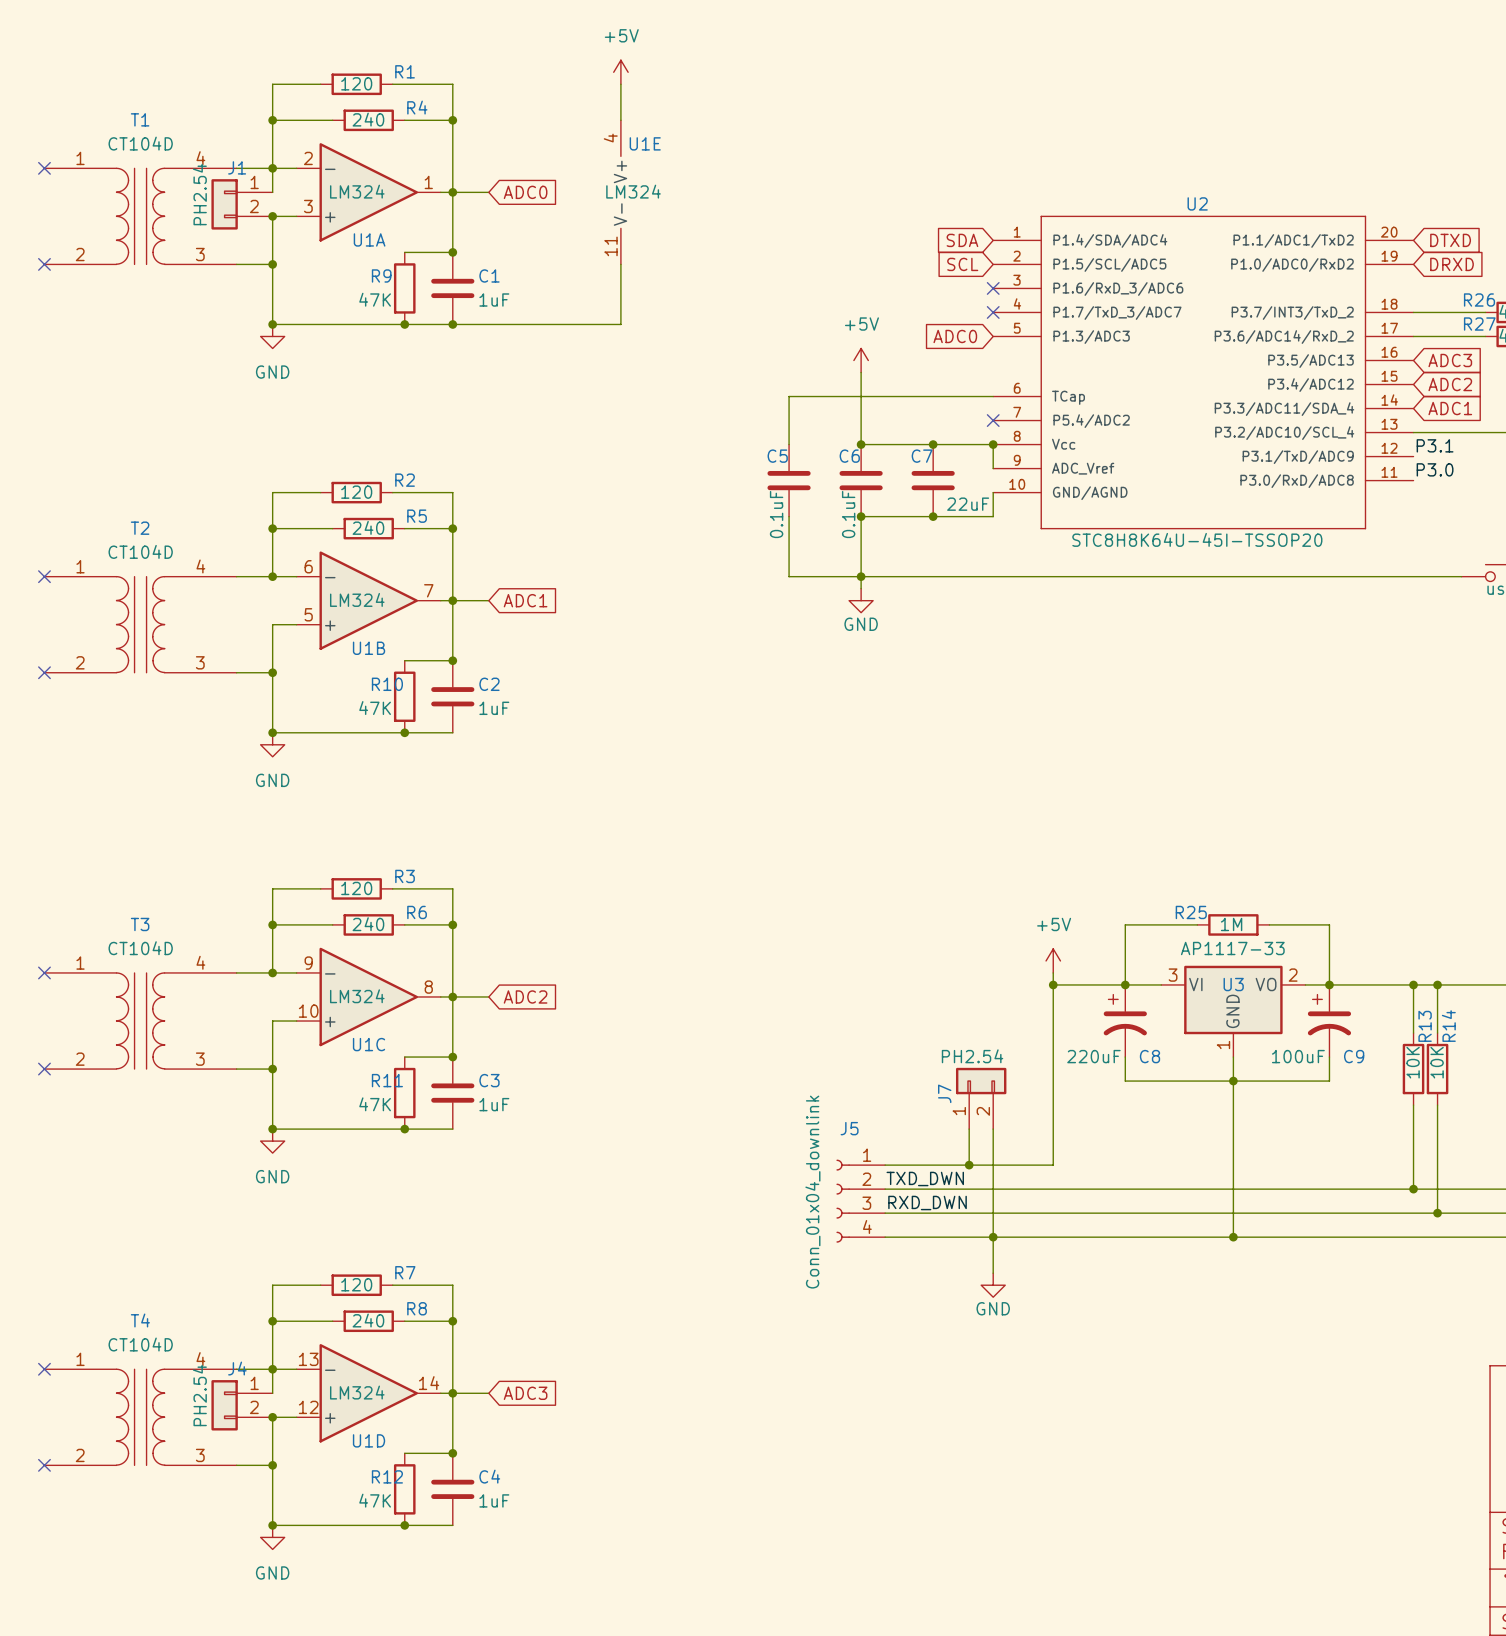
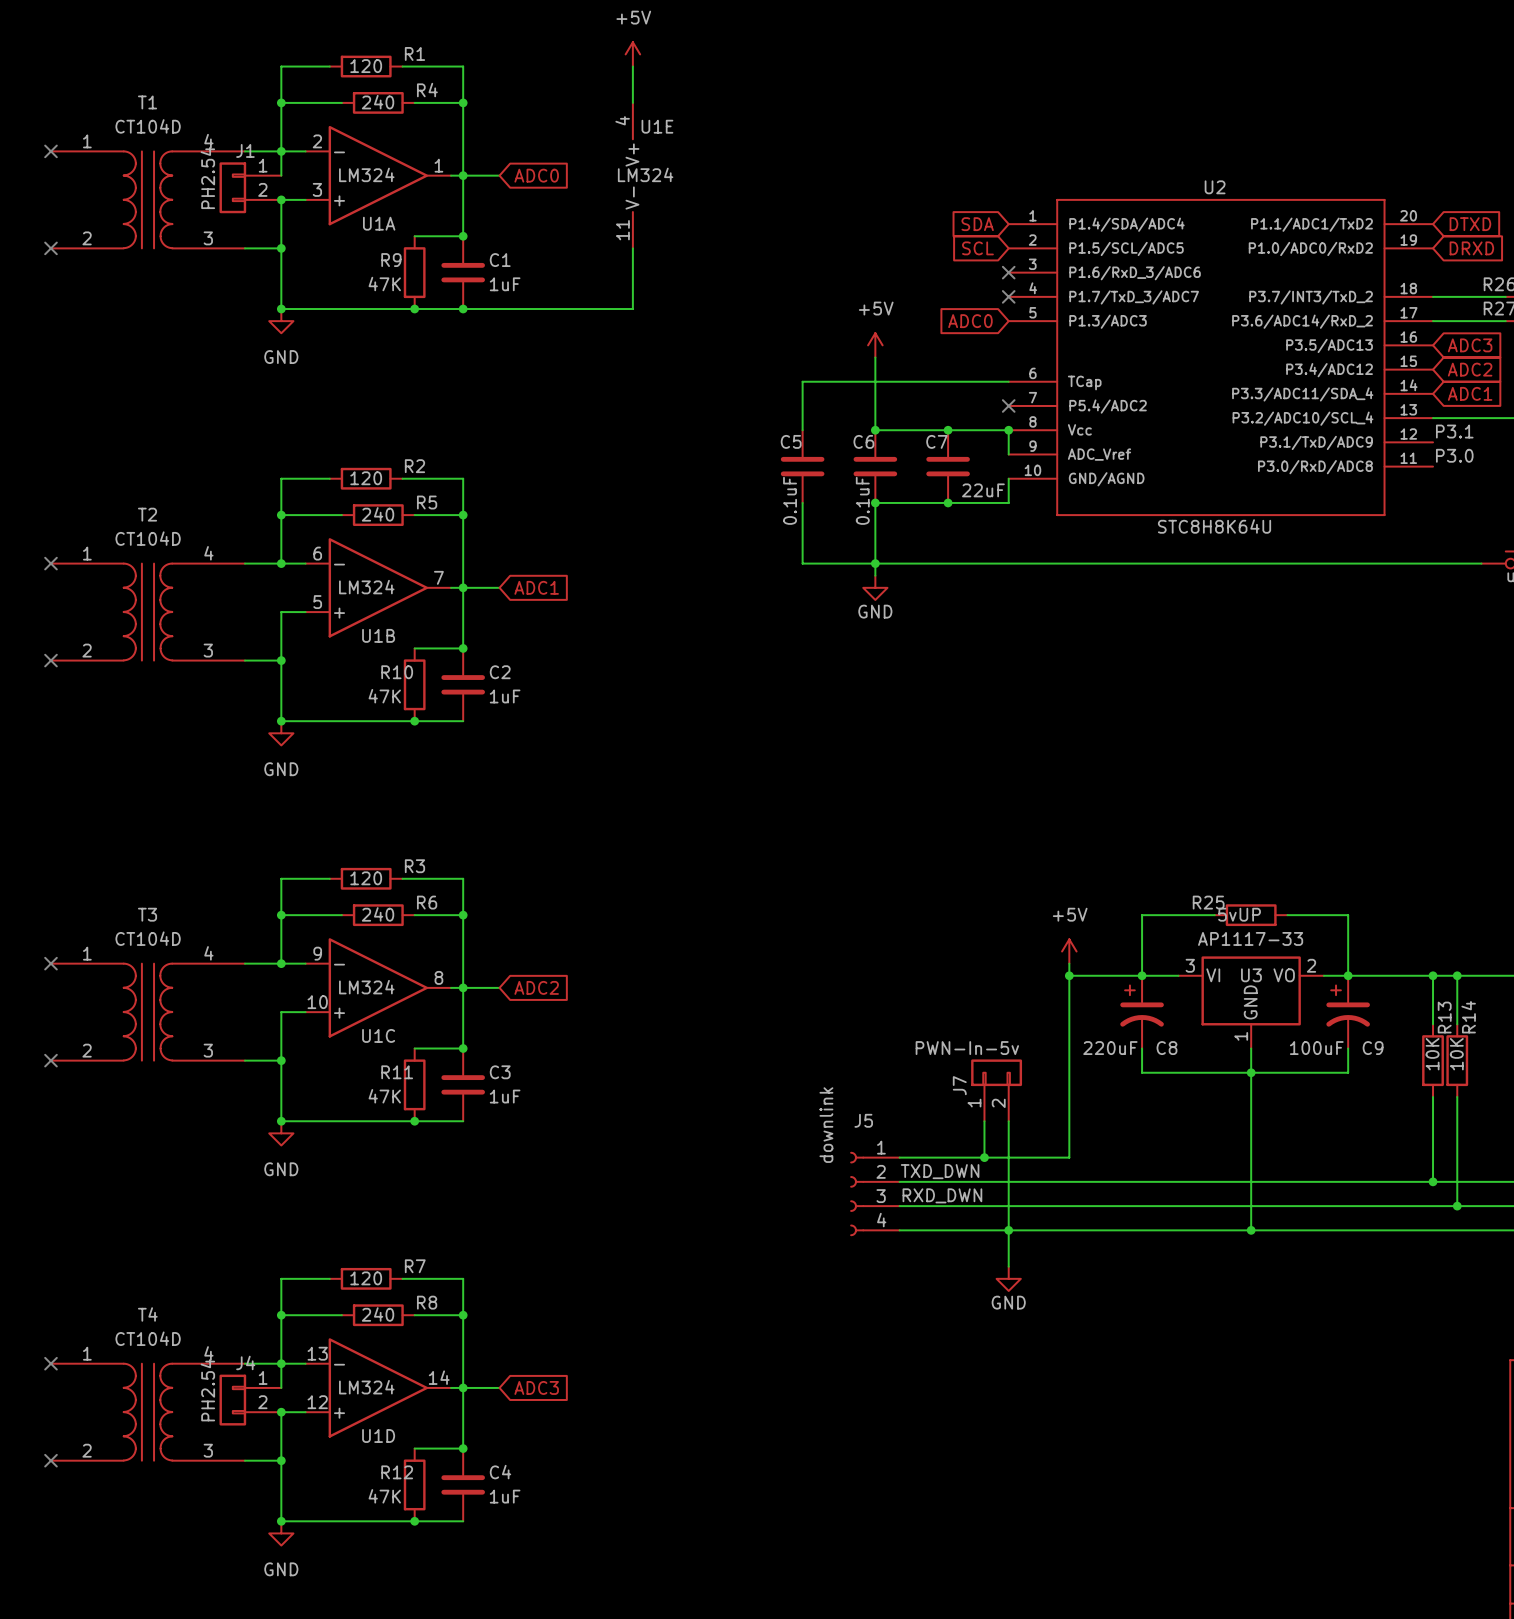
U2 value: STC8H8K64U-45I-TSSOP20 (1197, 539) -> STC8H8K64U (1214, 526)
R25 value: 1M (1231, 924) -> 5vUP (1239, 914)
J7 value: PH2.54 (972, 1056) -> PWN-In-5v (967, 1048)
J5 value: Conn_01x04_downlink (812, 1192) -> downlink (826, 1125)

